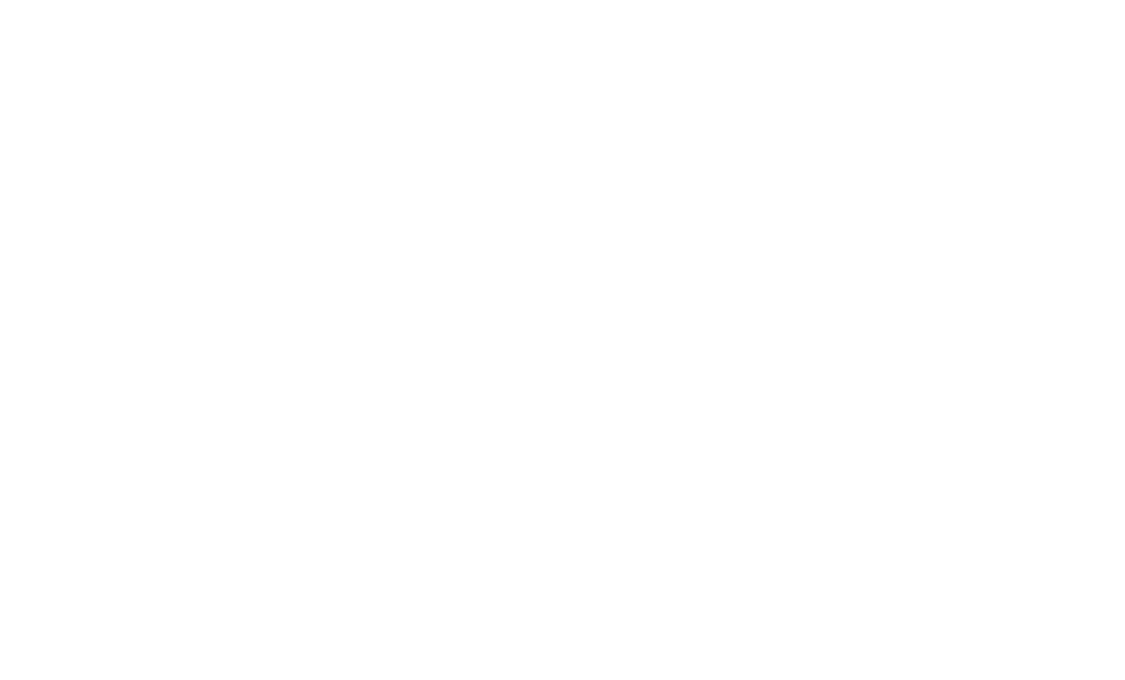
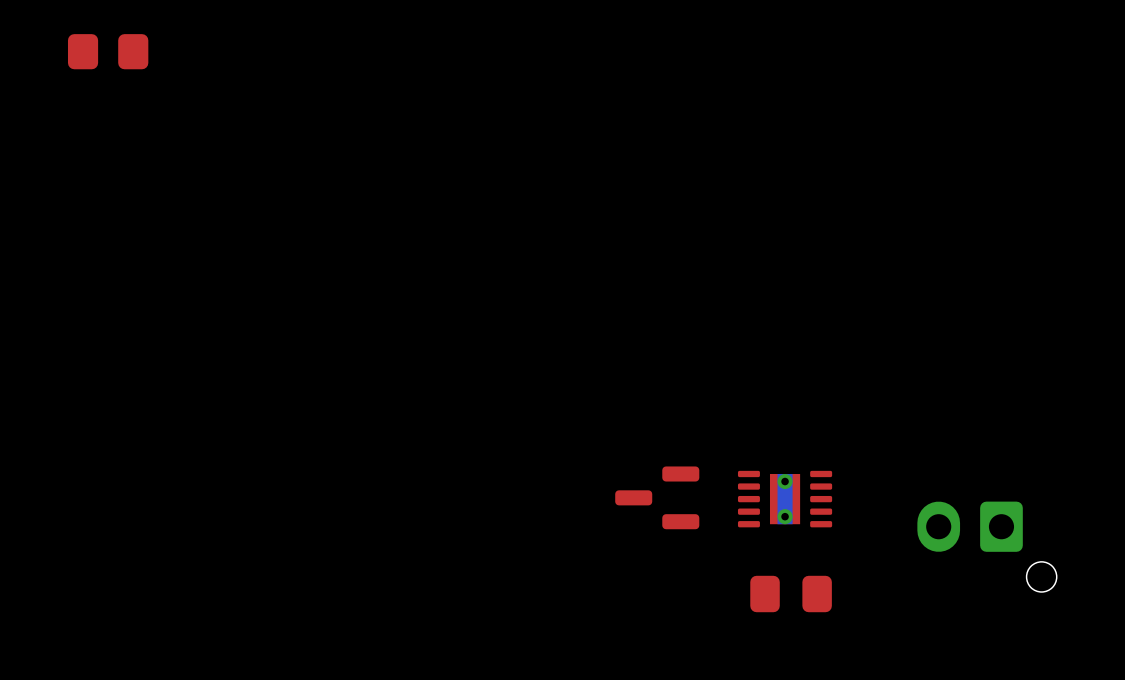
part: none -> (108, 51)
part: none -> (657, 497)
part: none -> (785, 499)
part: none -> (987, 546)
part: none -> (791, 594)

